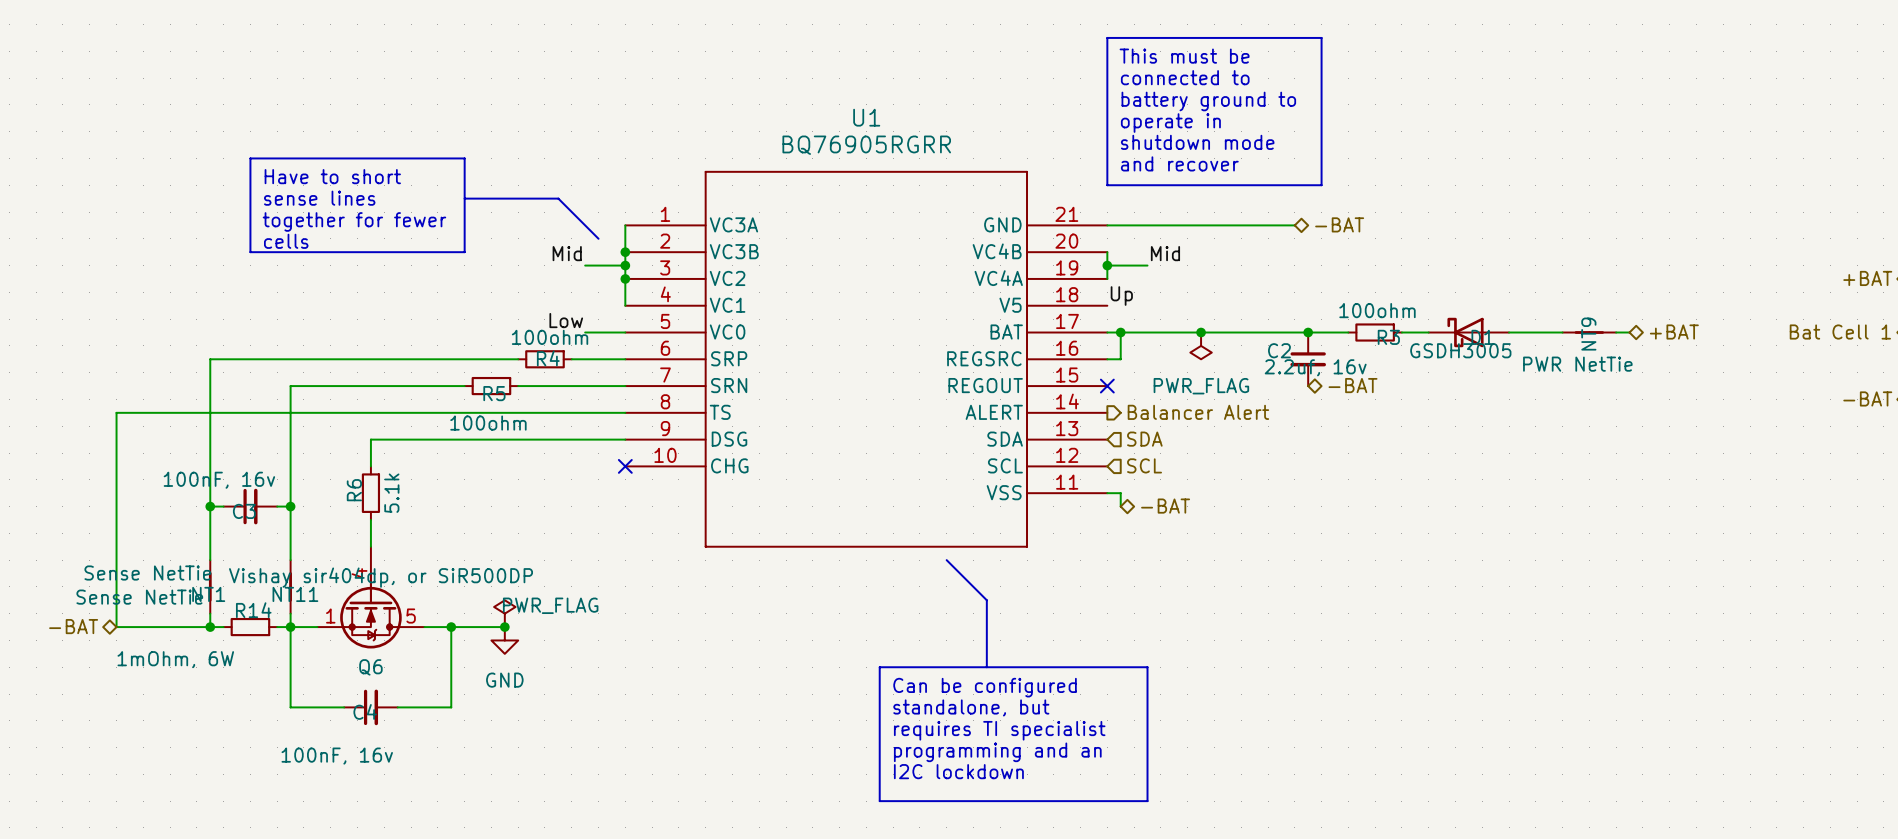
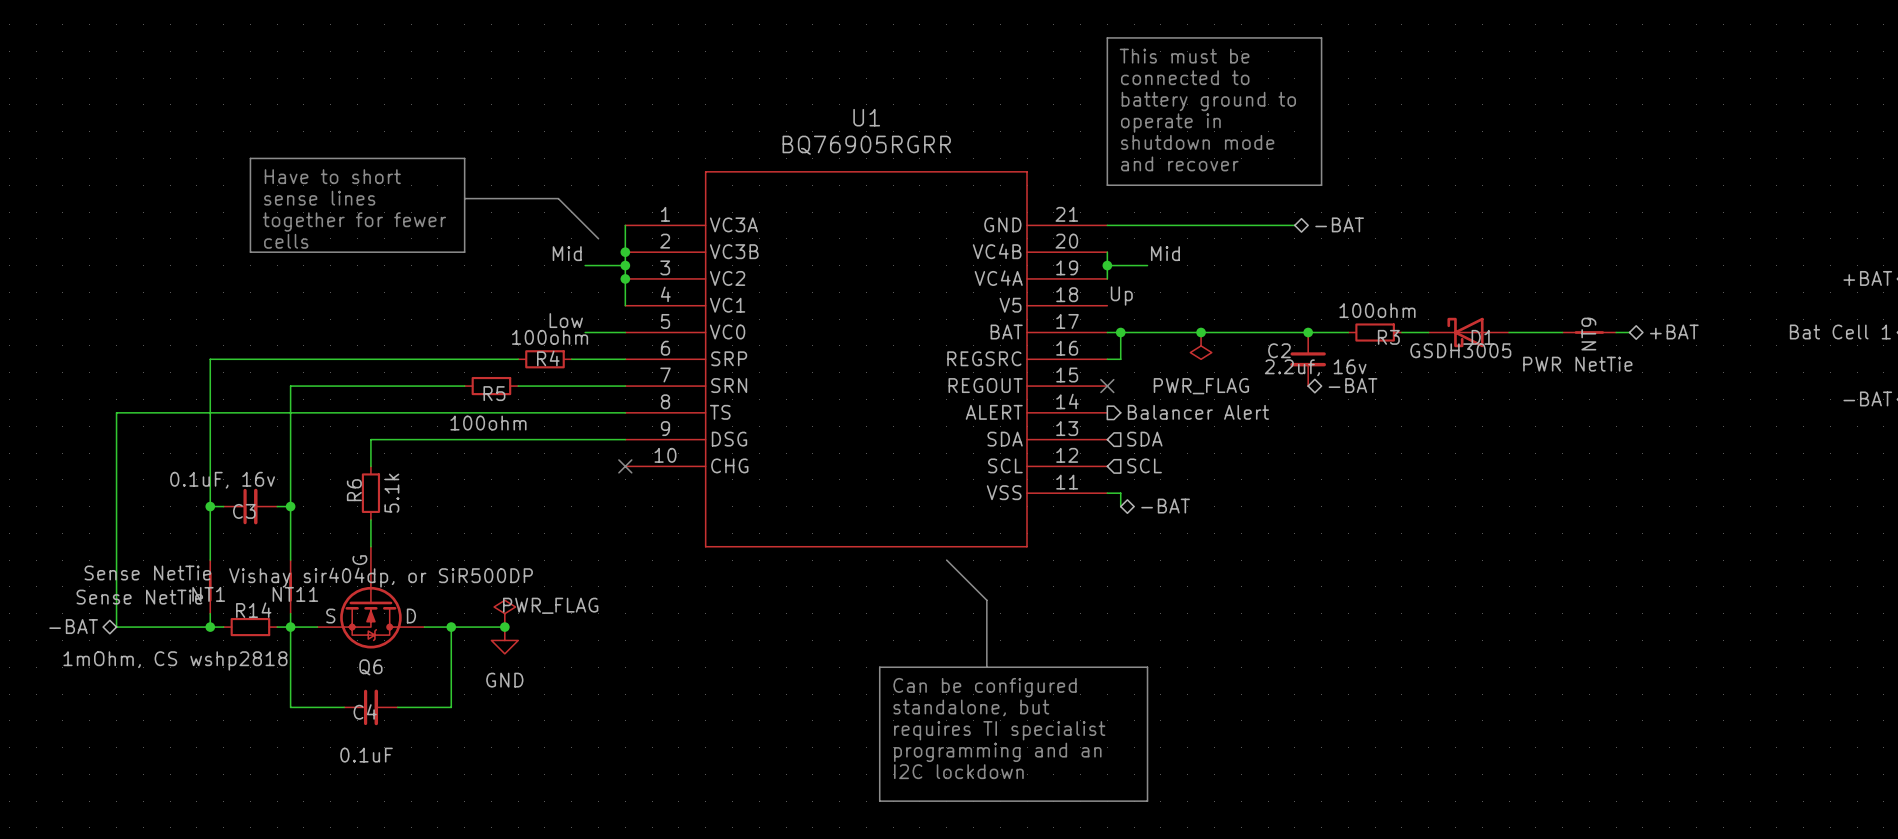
C3 value: 100nF, 16v (219, 480) -> 0.1uF, 16v (222, 480)
Q6 symbol: [317, 546, 425, 649] -> [317, 546, 425, 649]
R14 value: 1mOhm, 6W (175, 659) -> 1mOhm, CS wshp2818 (175, 660)
C4 value: 100nF, 16v (337, 756) -> 0.1uF (366, 755)

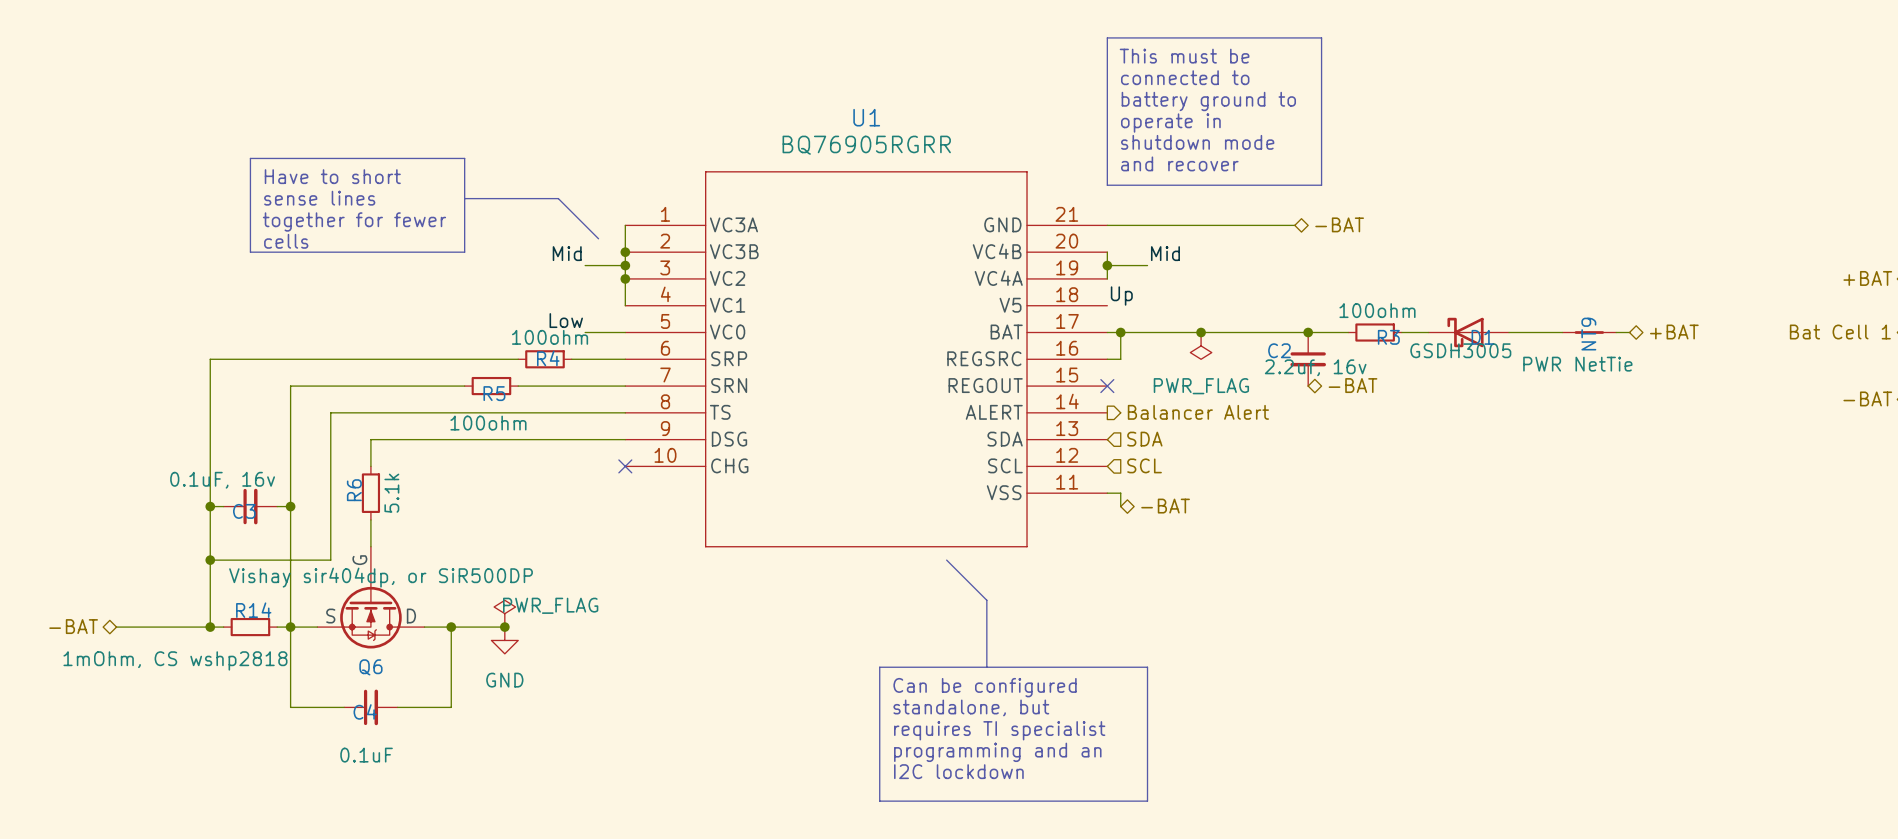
wire: (330, 412) (116, 412) (116, 627) -> (330, 412) (330, 560) (210, 560) (210, 613)
junction: none -> (210, 560)
NT1: Sense NetTie (210, 586) -> none
NT11: Sense NetTie (290, 586) -> none

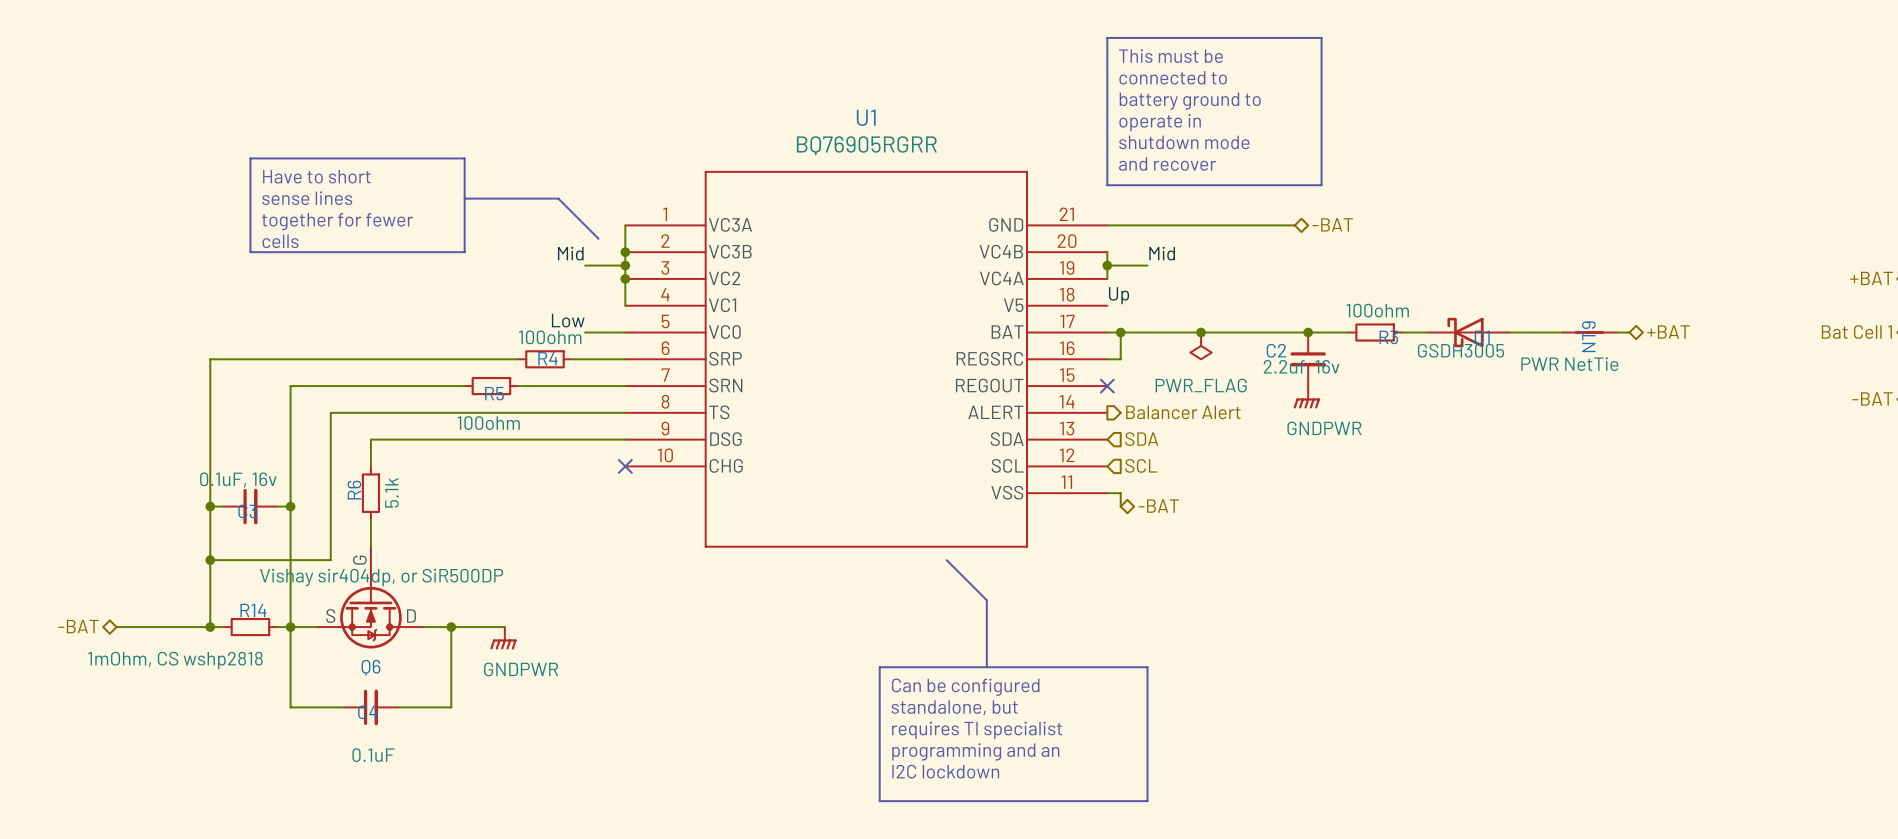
hierarchical label: -BAT (1353, 385) -> none
power symbol: none -> GNDPWR (1306, 397)
power symbol: PWR_FLAG (504, 613) -> none
junction: (504, 627) -> none
power symbol: GND (504, 640) -> GNDPWR (503, 638)

